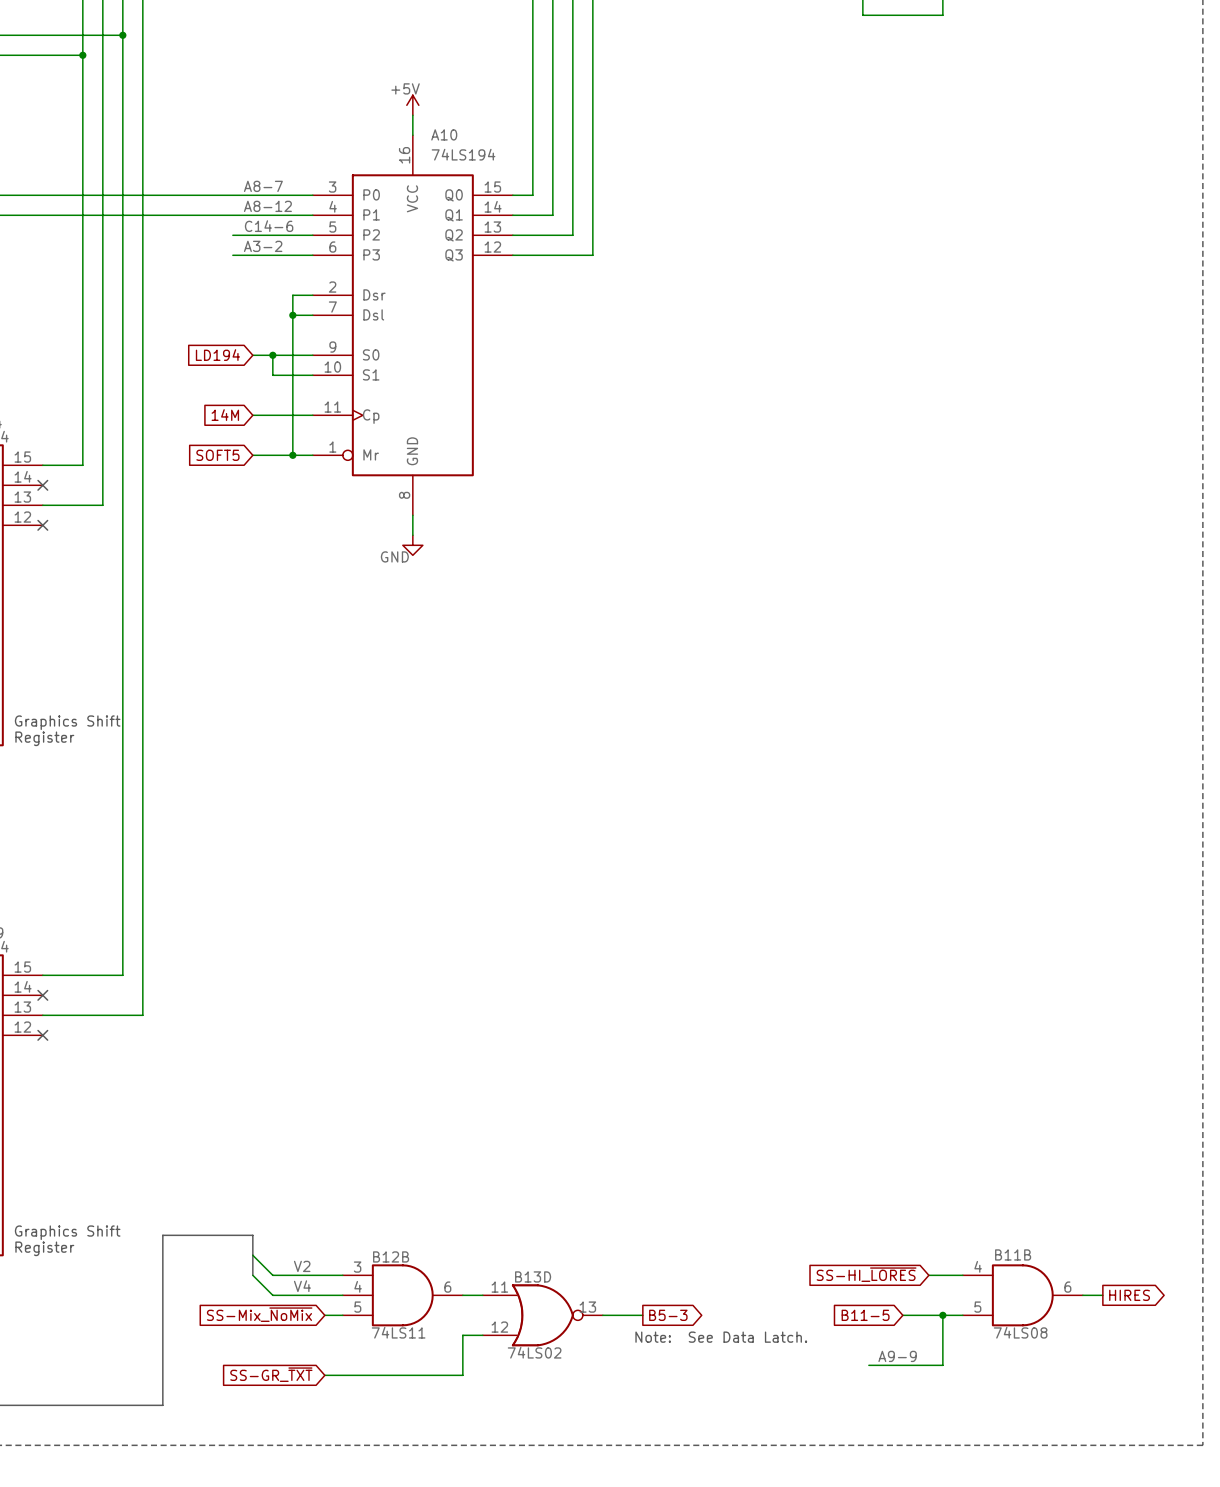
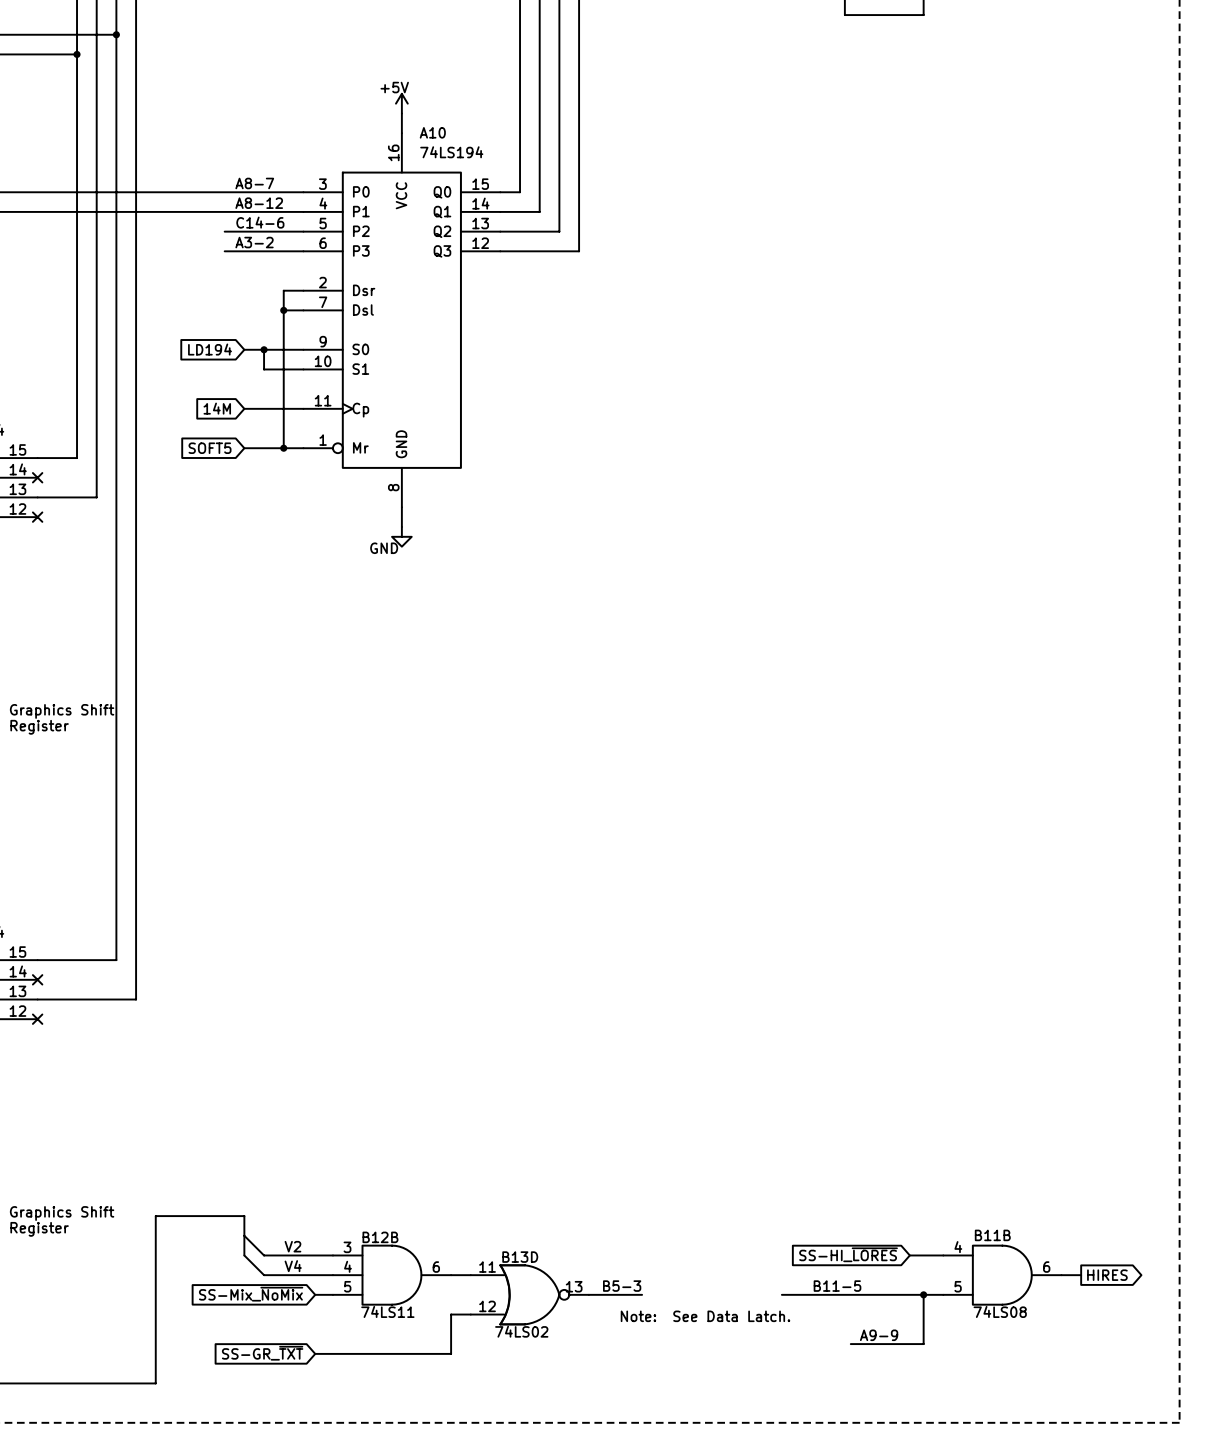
label: none -> B5-3 (622, 1286)
label: none -> B11-5 (837, 1286)
global label: B5-3 (668, 1315) -> none
wire: none -> (781, 1294) (884, 1294)
global label: B11-5 (865, 1315) -> none

